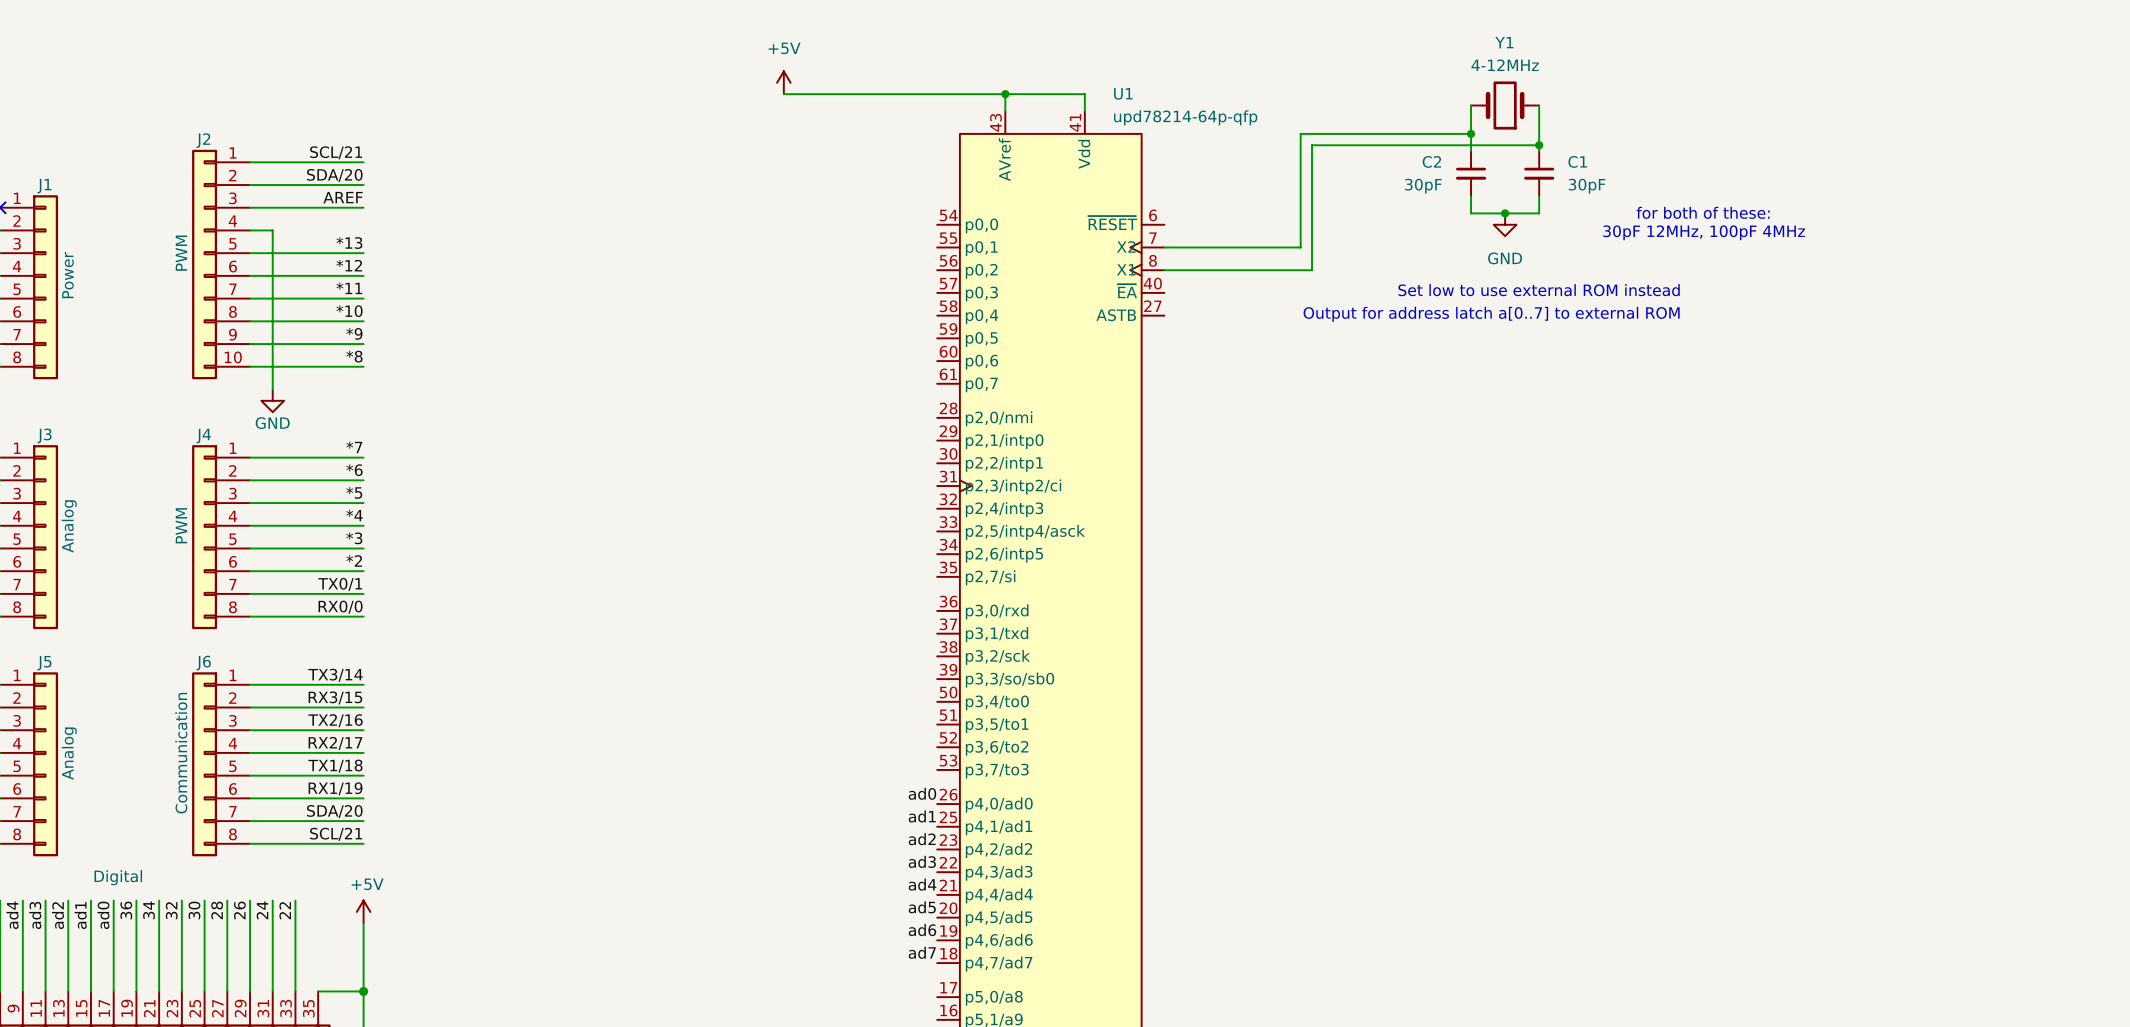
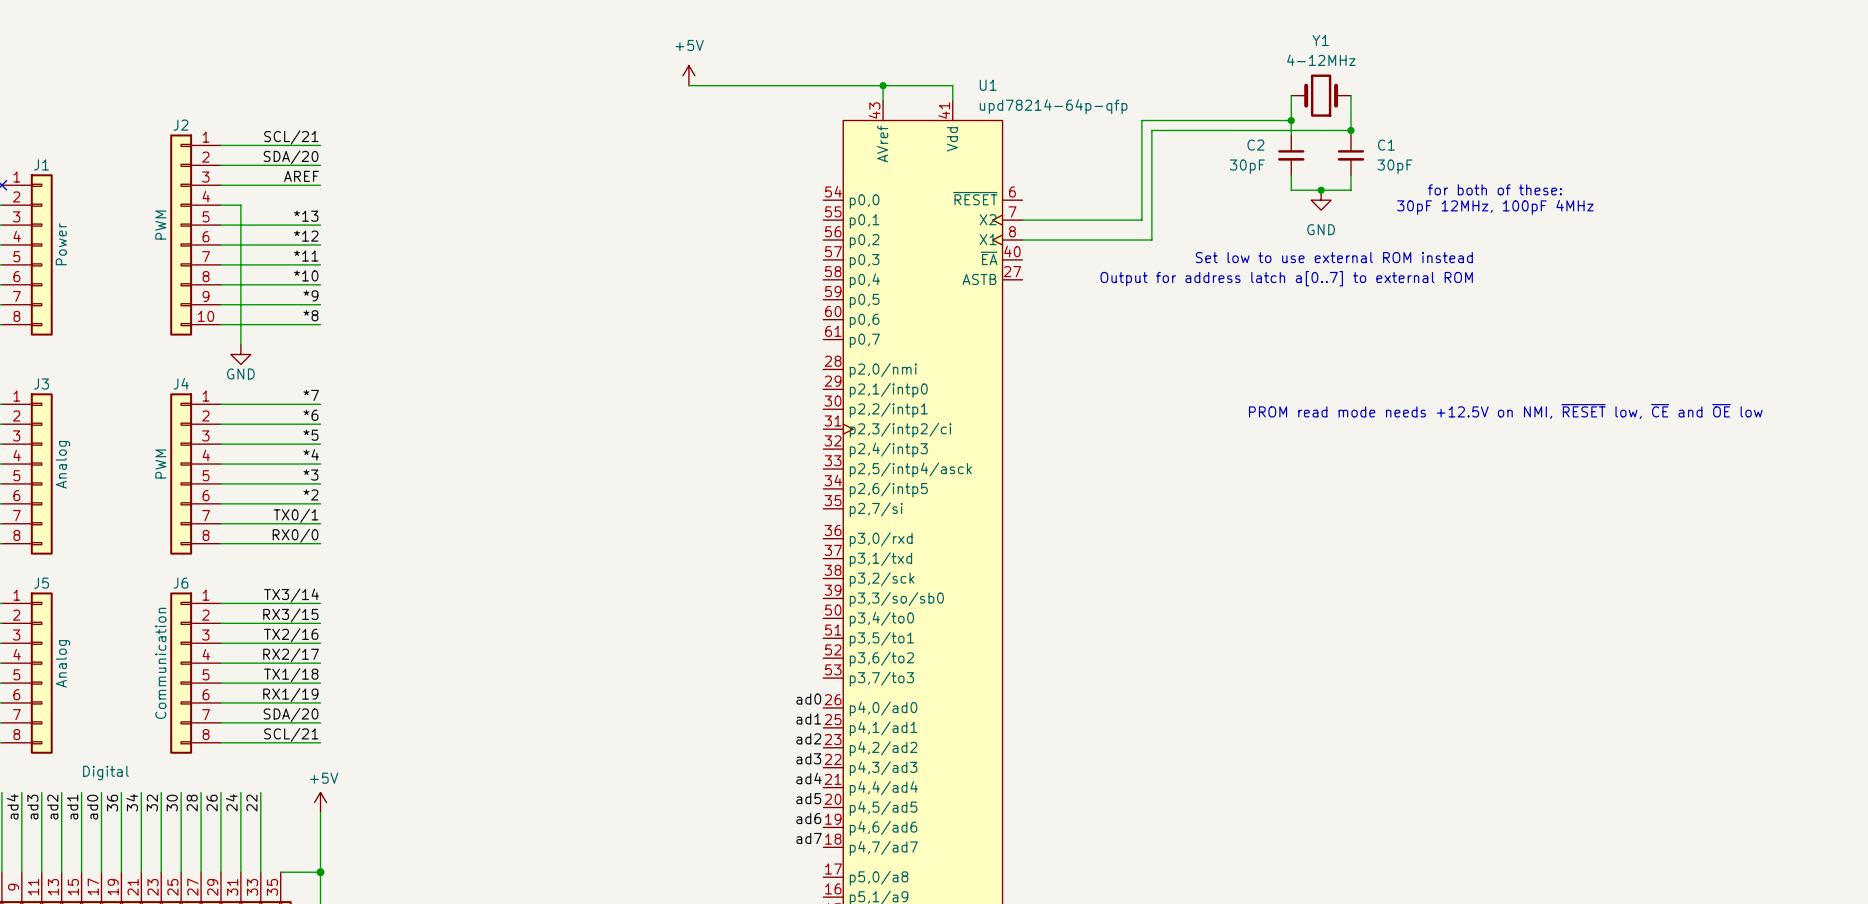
text: none -> PROM read mode needs +12.5V on NMI, ~{RESET} low, ~{CE} and ~{OE} low (1505, 411)

